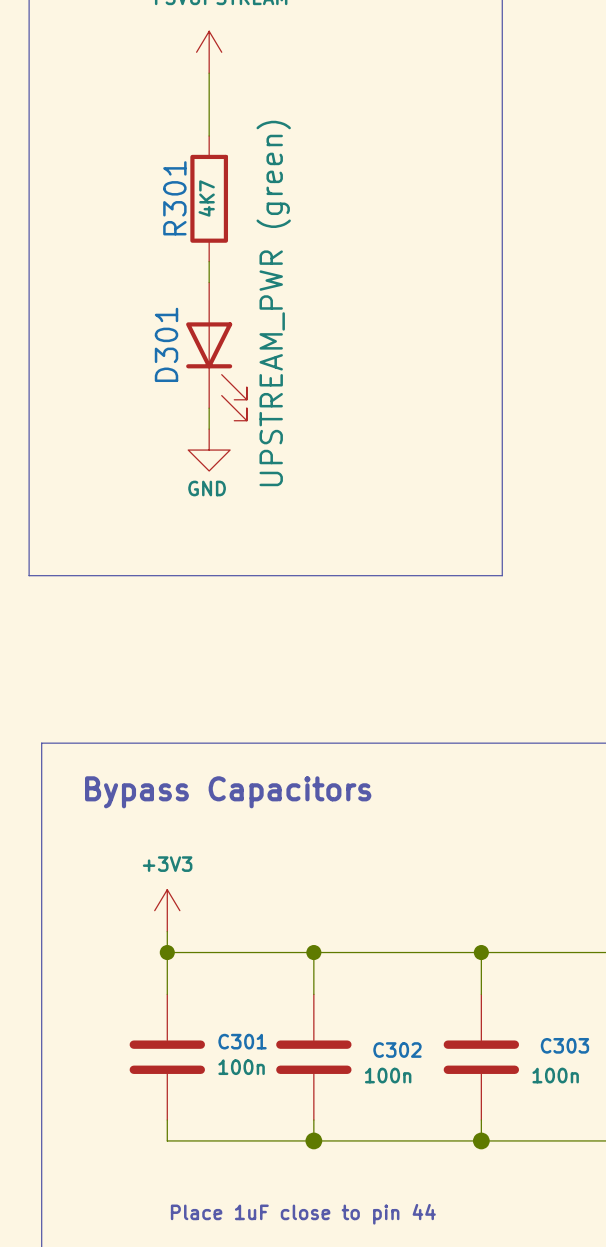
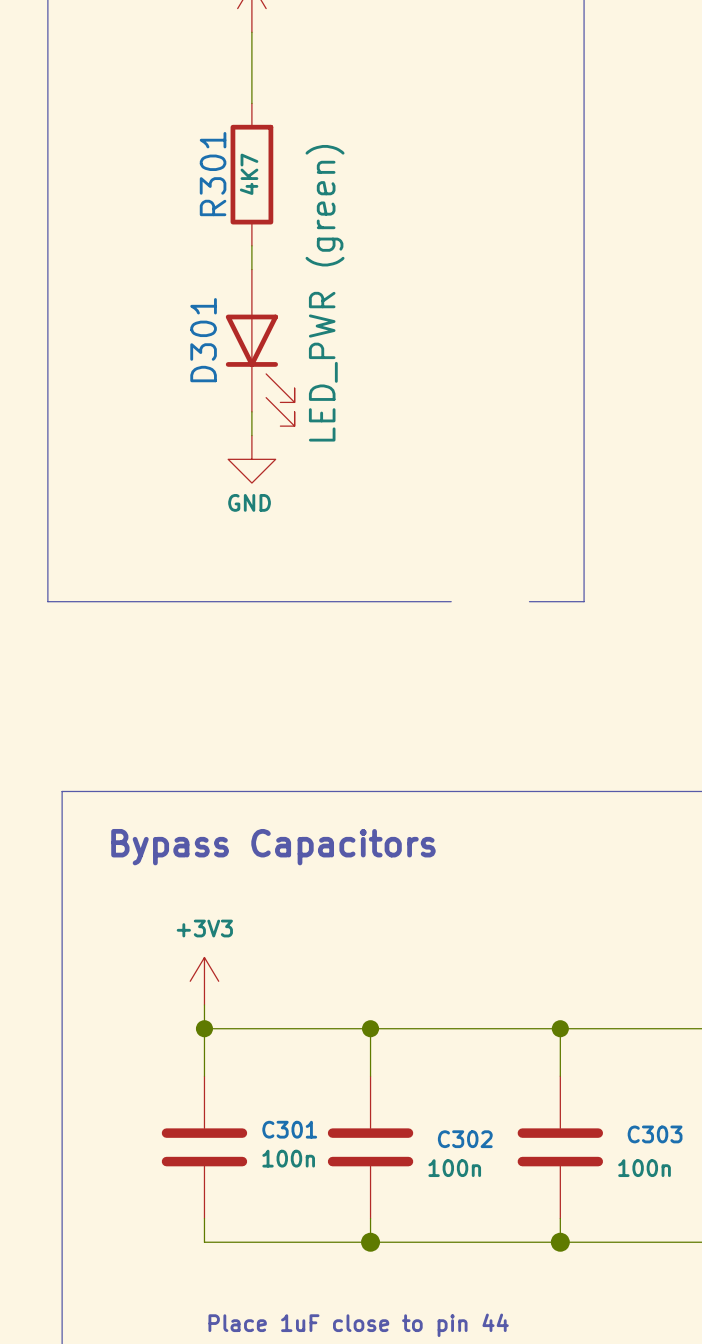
D301 text: UPSTREAM_PWR (green) (273, 303) -> LED_PWR (green) (325, 293)
line: (385, 575) (454, 575) -> none

